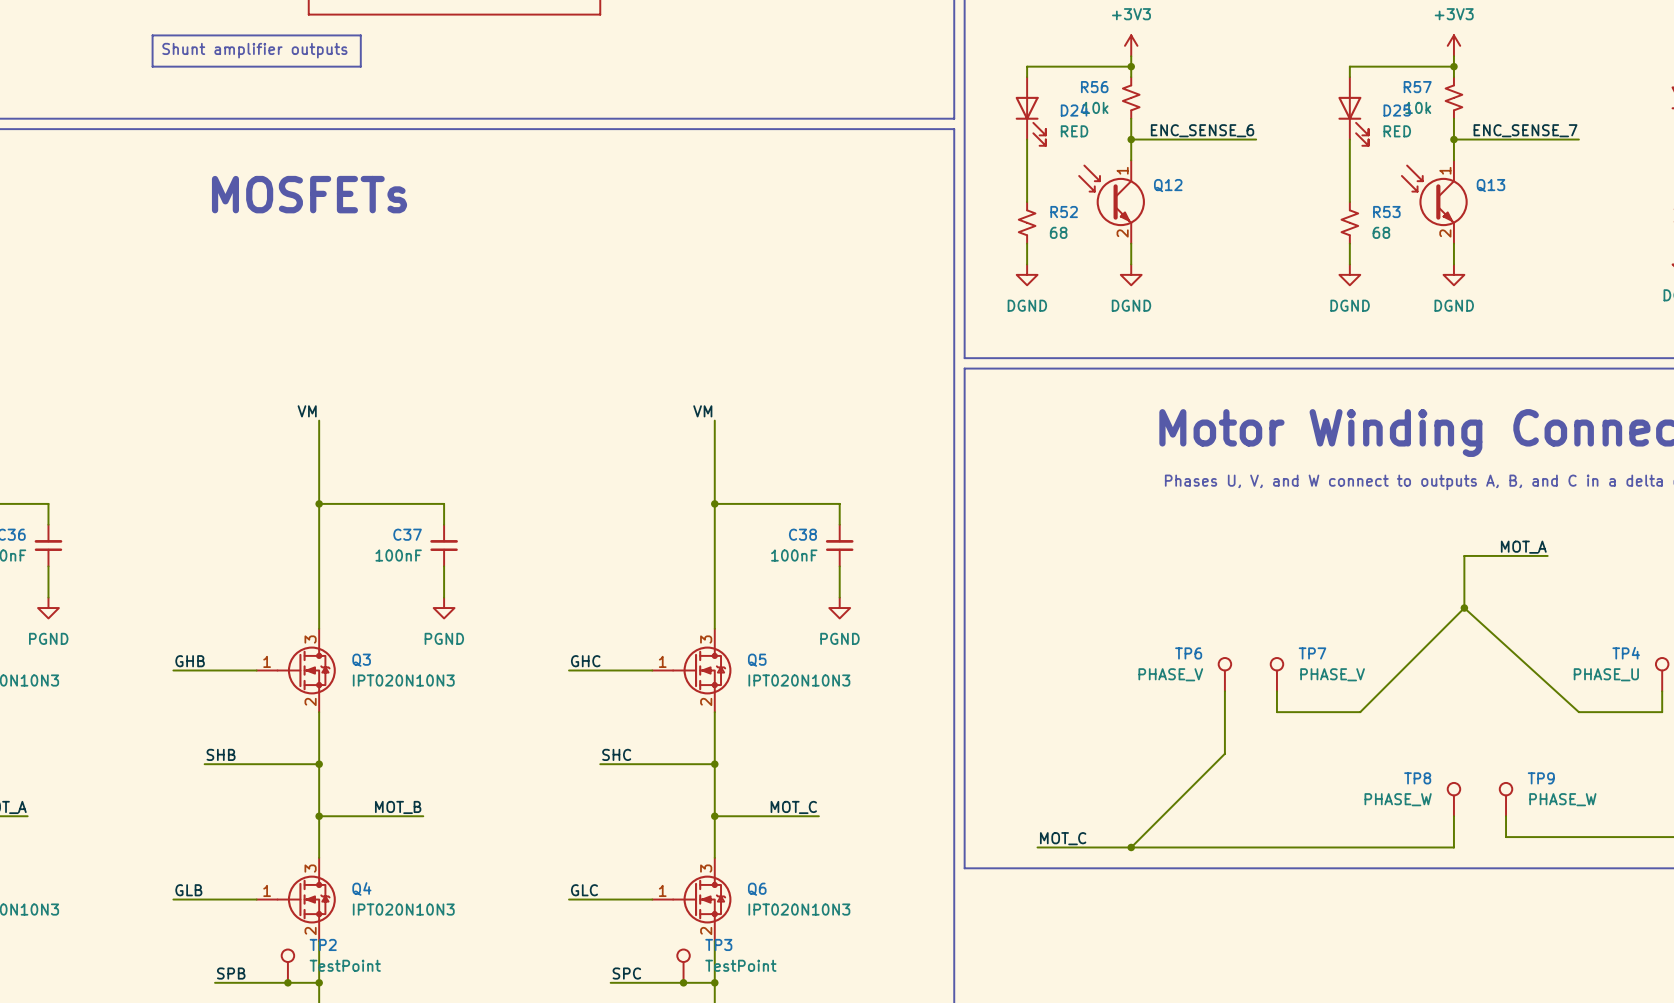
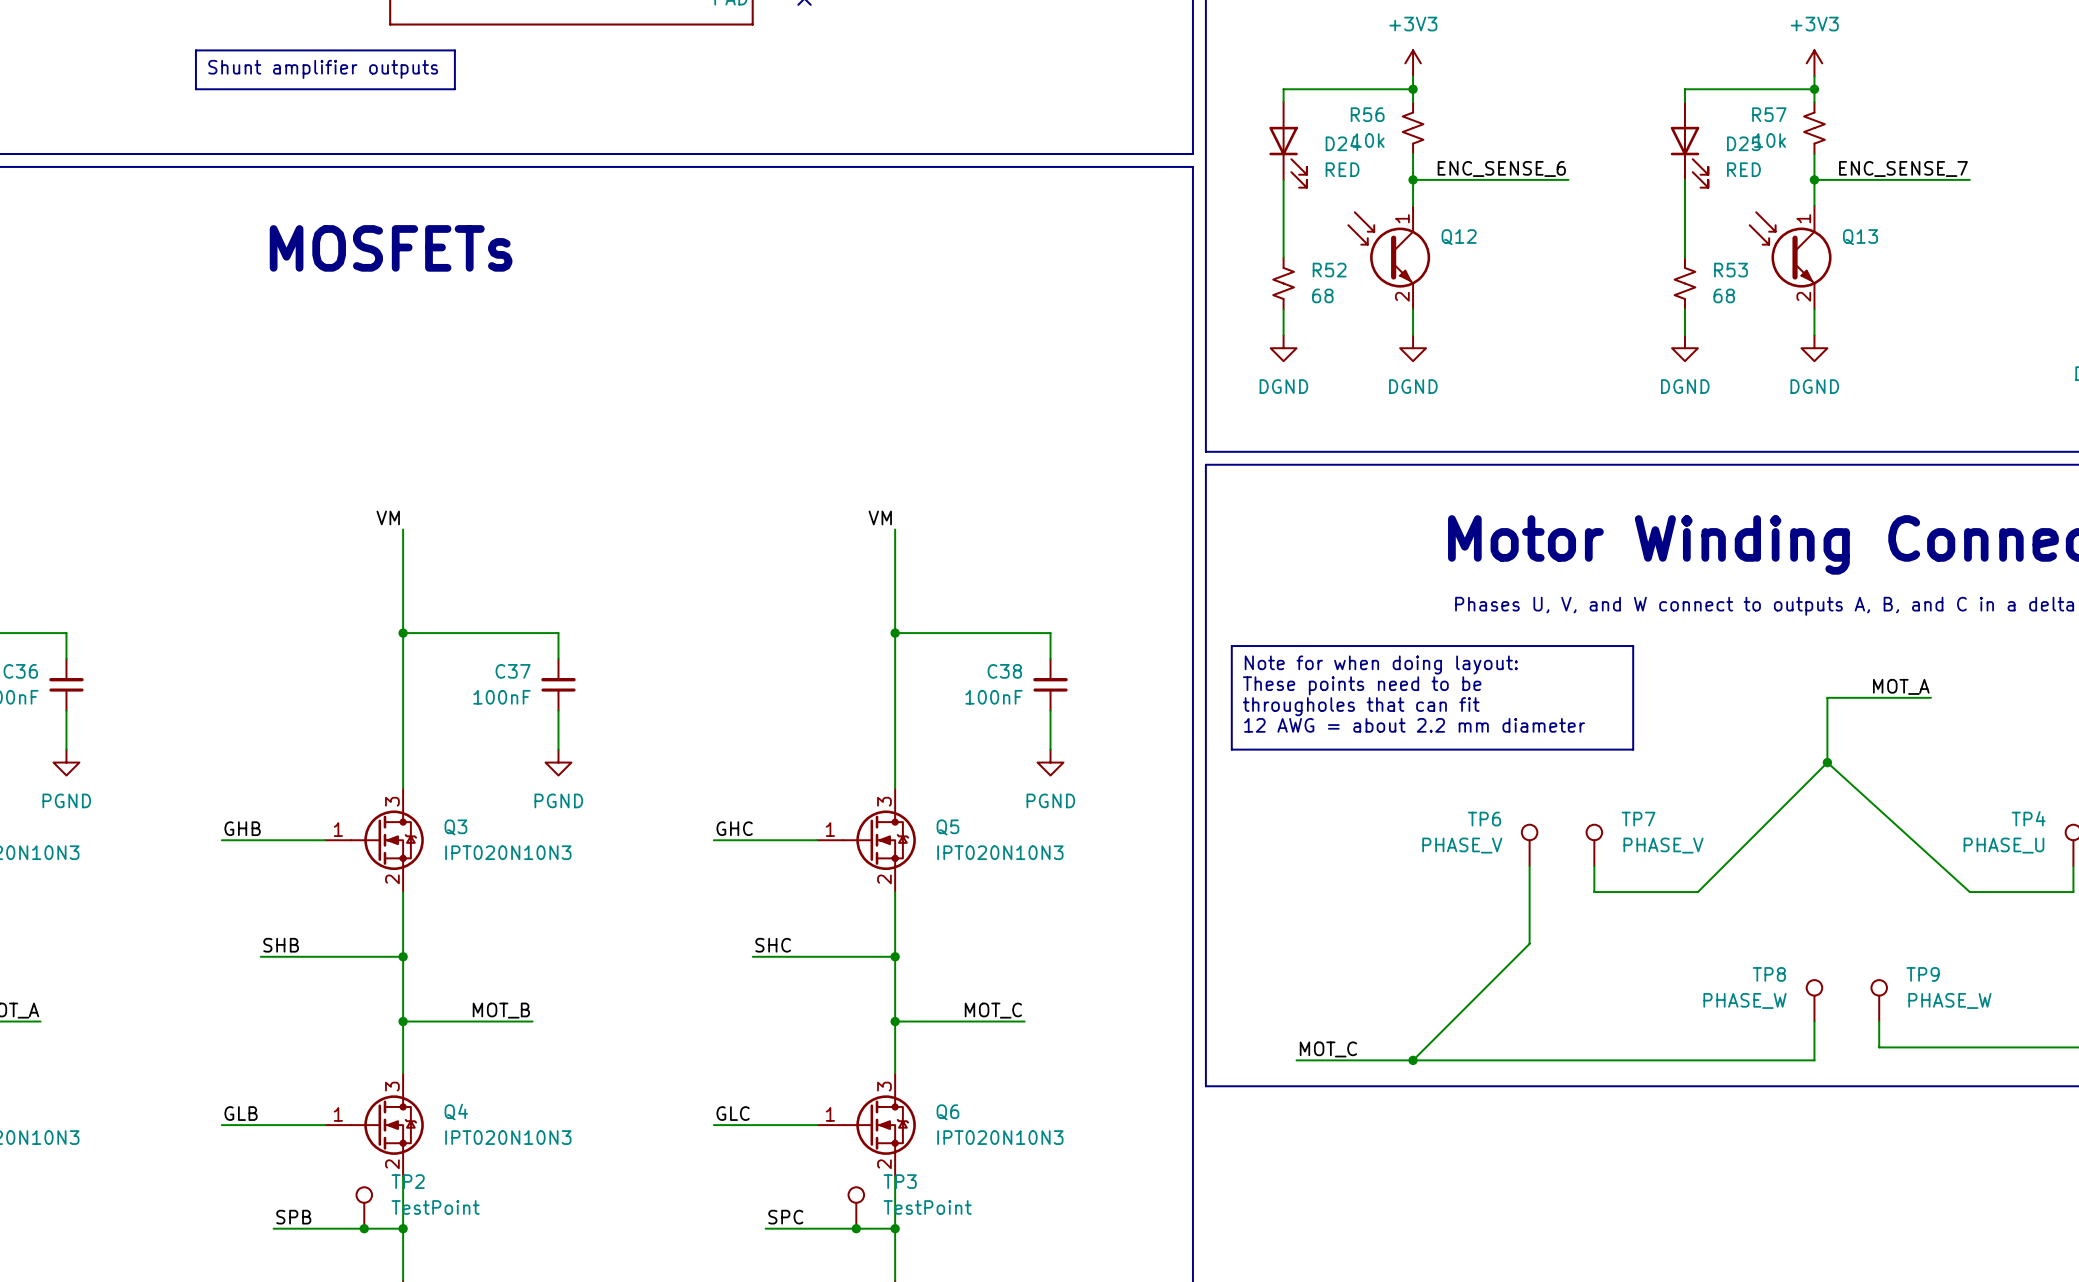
line: none -> (1231, 646) (1633, 646) (1633, 749) (1231, 749) (1231, 646)
text: none -> Note for when doing layout: (1381, 664)
text: none -> These points need to be (1362, 685)
text: none -> througholes that can fit (1361, 706)
text: none -> 12 AWG = about 2.2 mm diameter (1414, 725)

